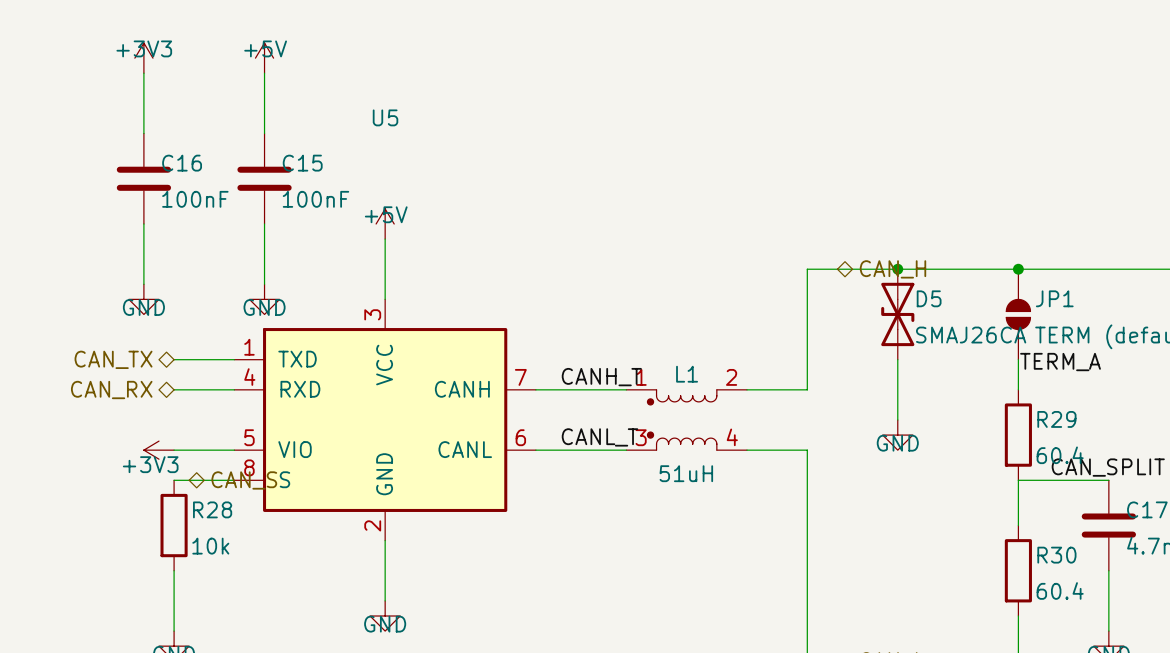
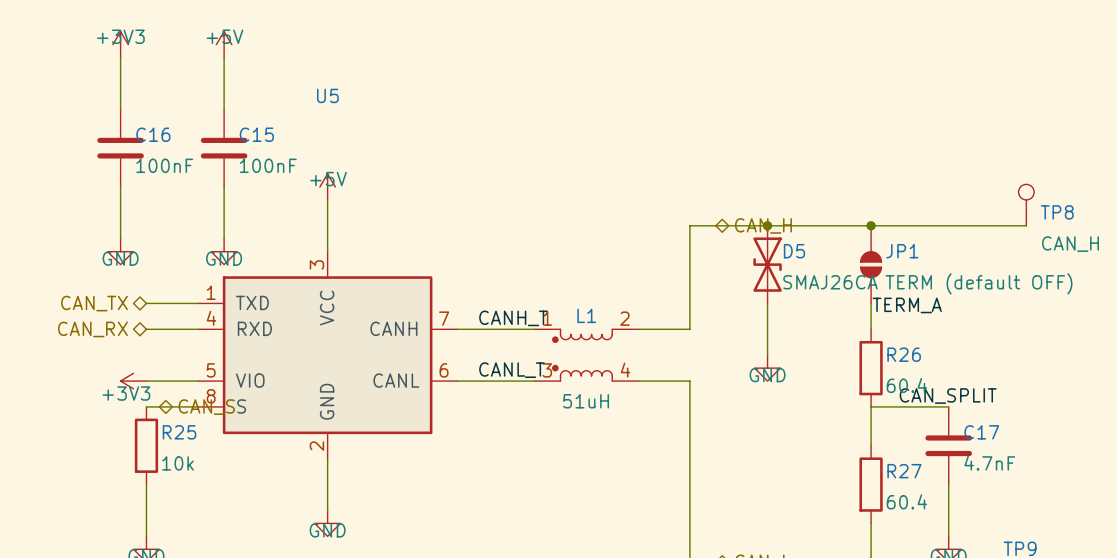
R29 name: R29 (1056, 419) -> R26 (904, 354)
R28 name: R28 (212, 509) -> R25 (179, 432)
R30 name: R30 (1056, 555) -> R27 (904, 471)

